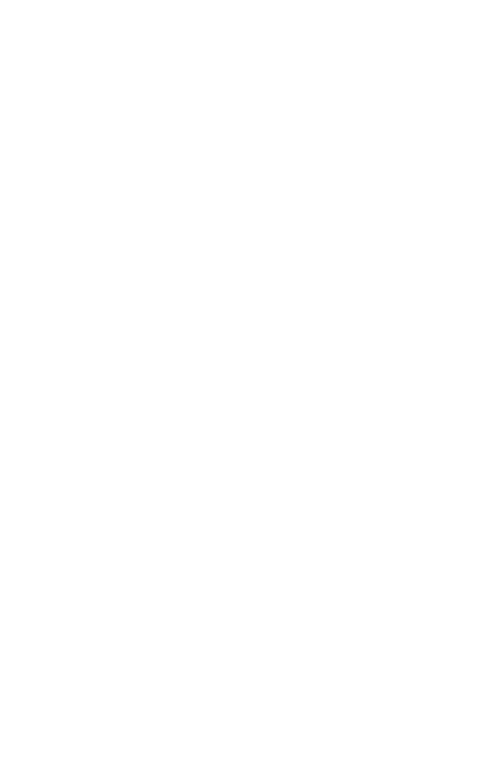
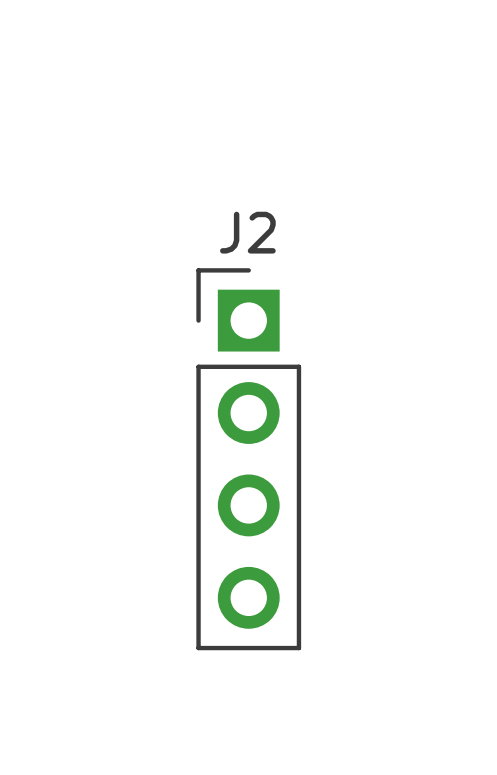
J2: none -> (248, 459)

